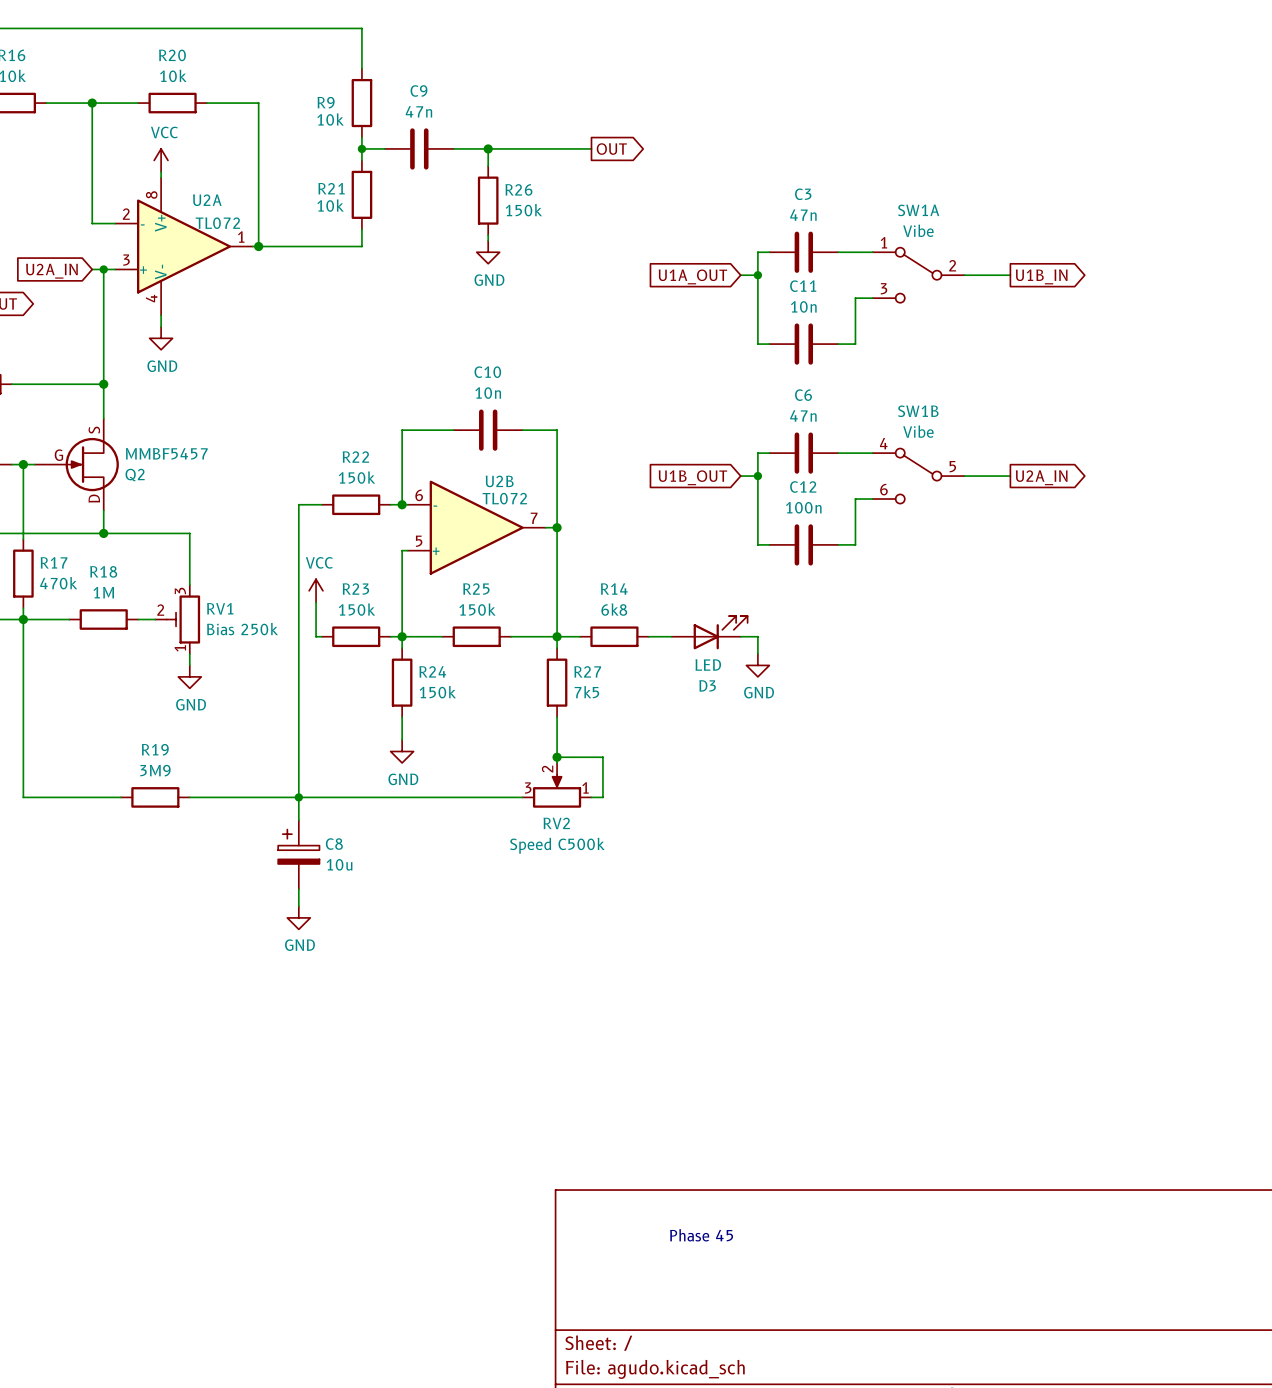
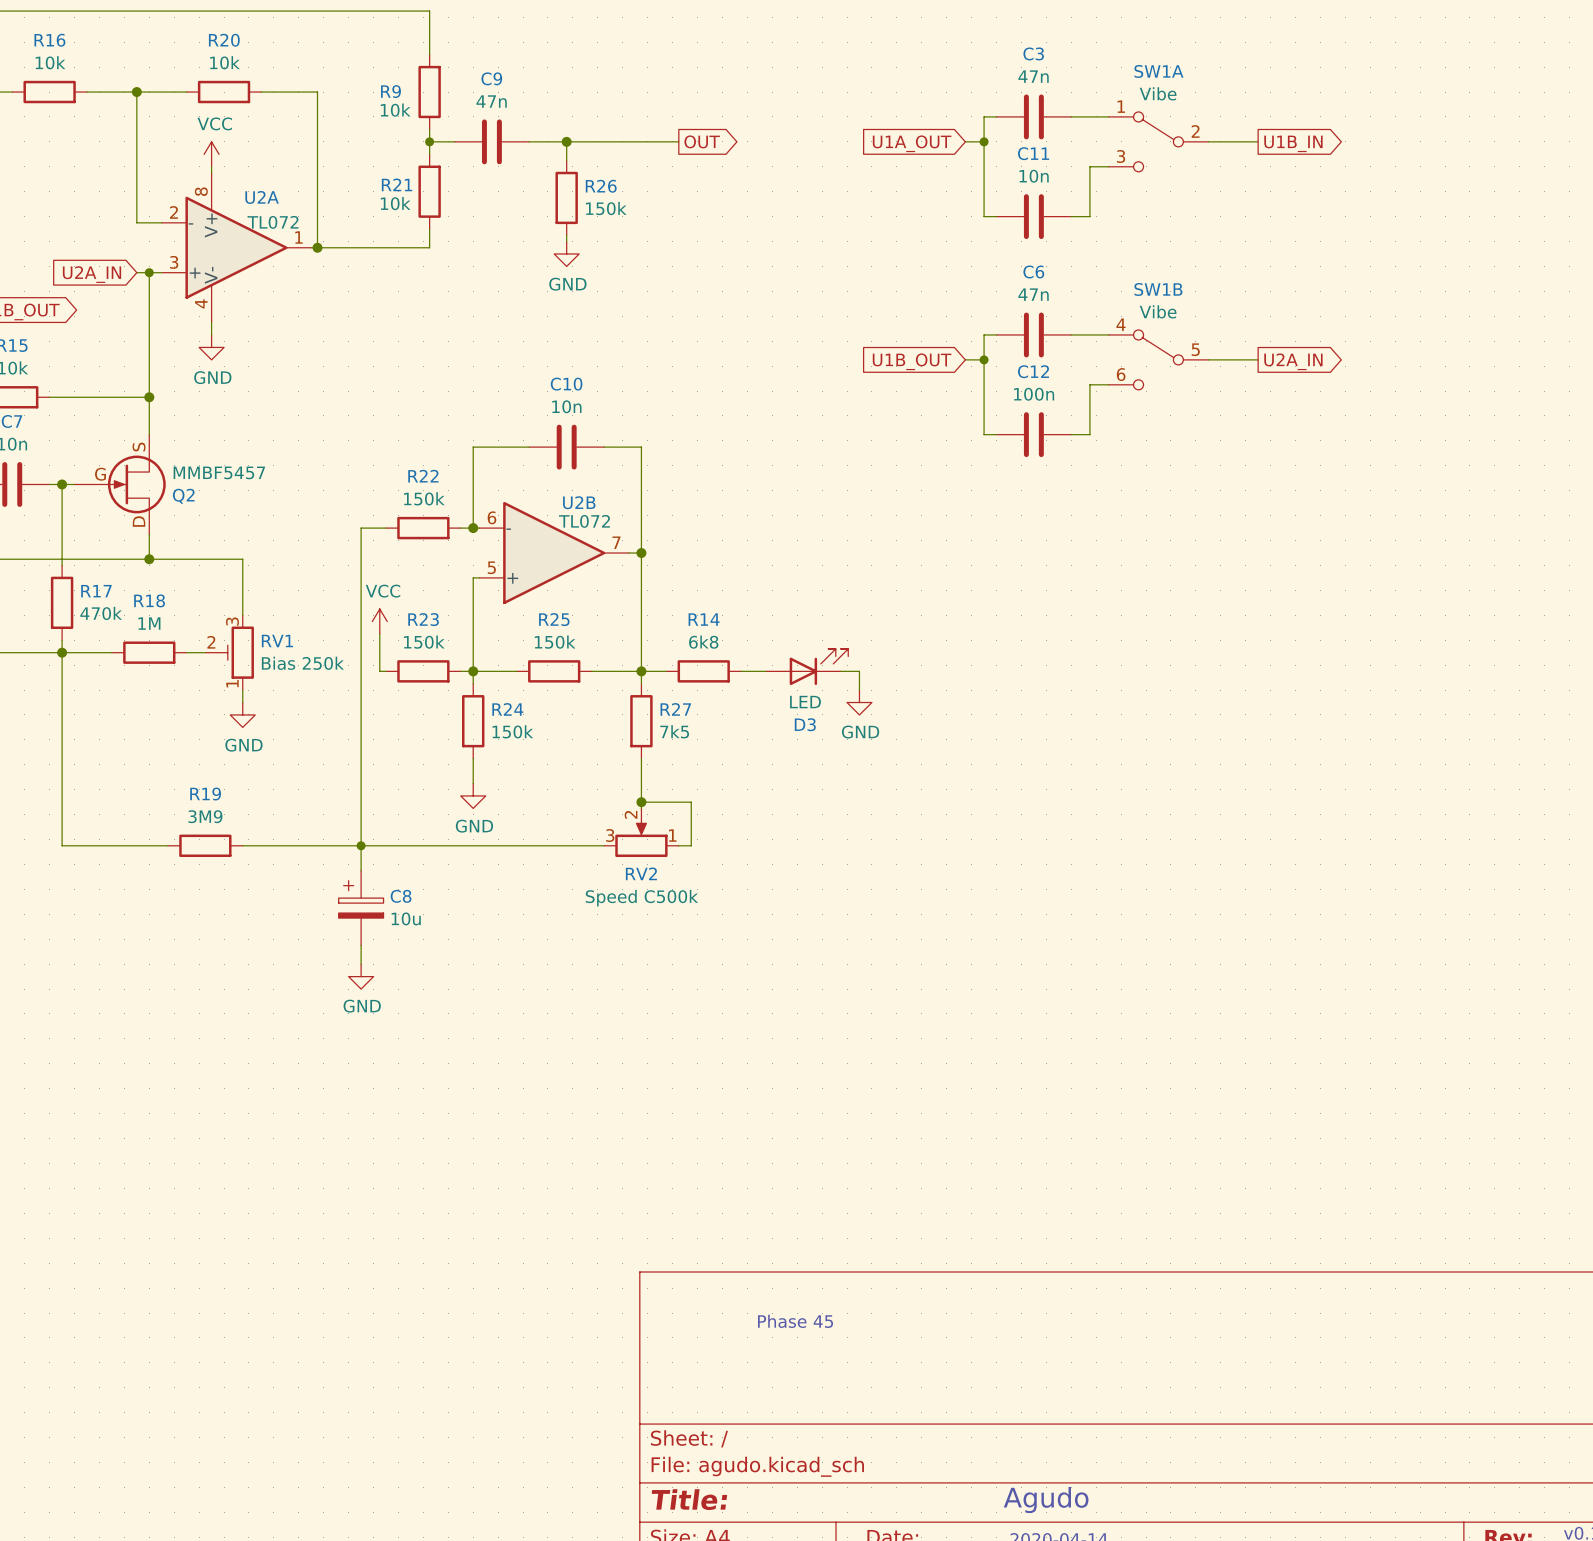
junction: none -> (984, 141)
wire: (769, 252) (757, 252) (757, 344) (769, 344) -> (996, 116) (984, 116) (984, 216) (996, 216)
C3 position: (803, 252) -> (1033, 116)
wire: (838, 252) (872, 252) -> (1071, 116) (1108, 116)
wire: (740, 275) (757, 275) -> (965, 141) (984, 141)
junction: (757, 275) -> none
SW1A position: (918, 275) -> (1158, 141)
wire: (964, 275) (1010, 275) -> (1208, 141) (1258, 141)
global label position: U1A_OUT (692, 276) -> U1A_OUT (912, 143)
global label position: U1B_IN (1041, 276) -> U1B_IN (1293, 143)
wire: (872, 298) (855, 298) (855, 344) (838, 344) -> (1108, 166) (1089, 166) (1089, 216) (1071, 216)
C11 position: (803, 344) -> (1033, 216)
junction: none -> (984, 359)
wire: (769, 453) (757, 453) (757, 544) (769, 544) -> (996, 334) (984, 334) (984, 434) (996, 434)
C6 position: (803, 453) -> (1033, 334)
wire: (838, 453) (872, 453) -> (1071, 334) (1108, 334)
wire: (740, 476) (757, 476) -> (965, 359) (984, 359)
junction: (757, 476) -> none
SW1B position: (918, 476) -> (1158, 359)
wire: (964, 476) (1010, 476) -> (1208, 359) (1258, 359)
global label position: U1B_OUT (692, 477) -> U1B_OUT (912, 361)
global label position: U2A_IN (1041, 477) -> U2A_IN (1293, 361)
wire: (872, 499) (855, 499) (855, 544) (838, 544) -> (1108, 384) (1089, 384) (1089, 434) (1071, 434)
C12 position: (803, 544) -> (1033, 434)

